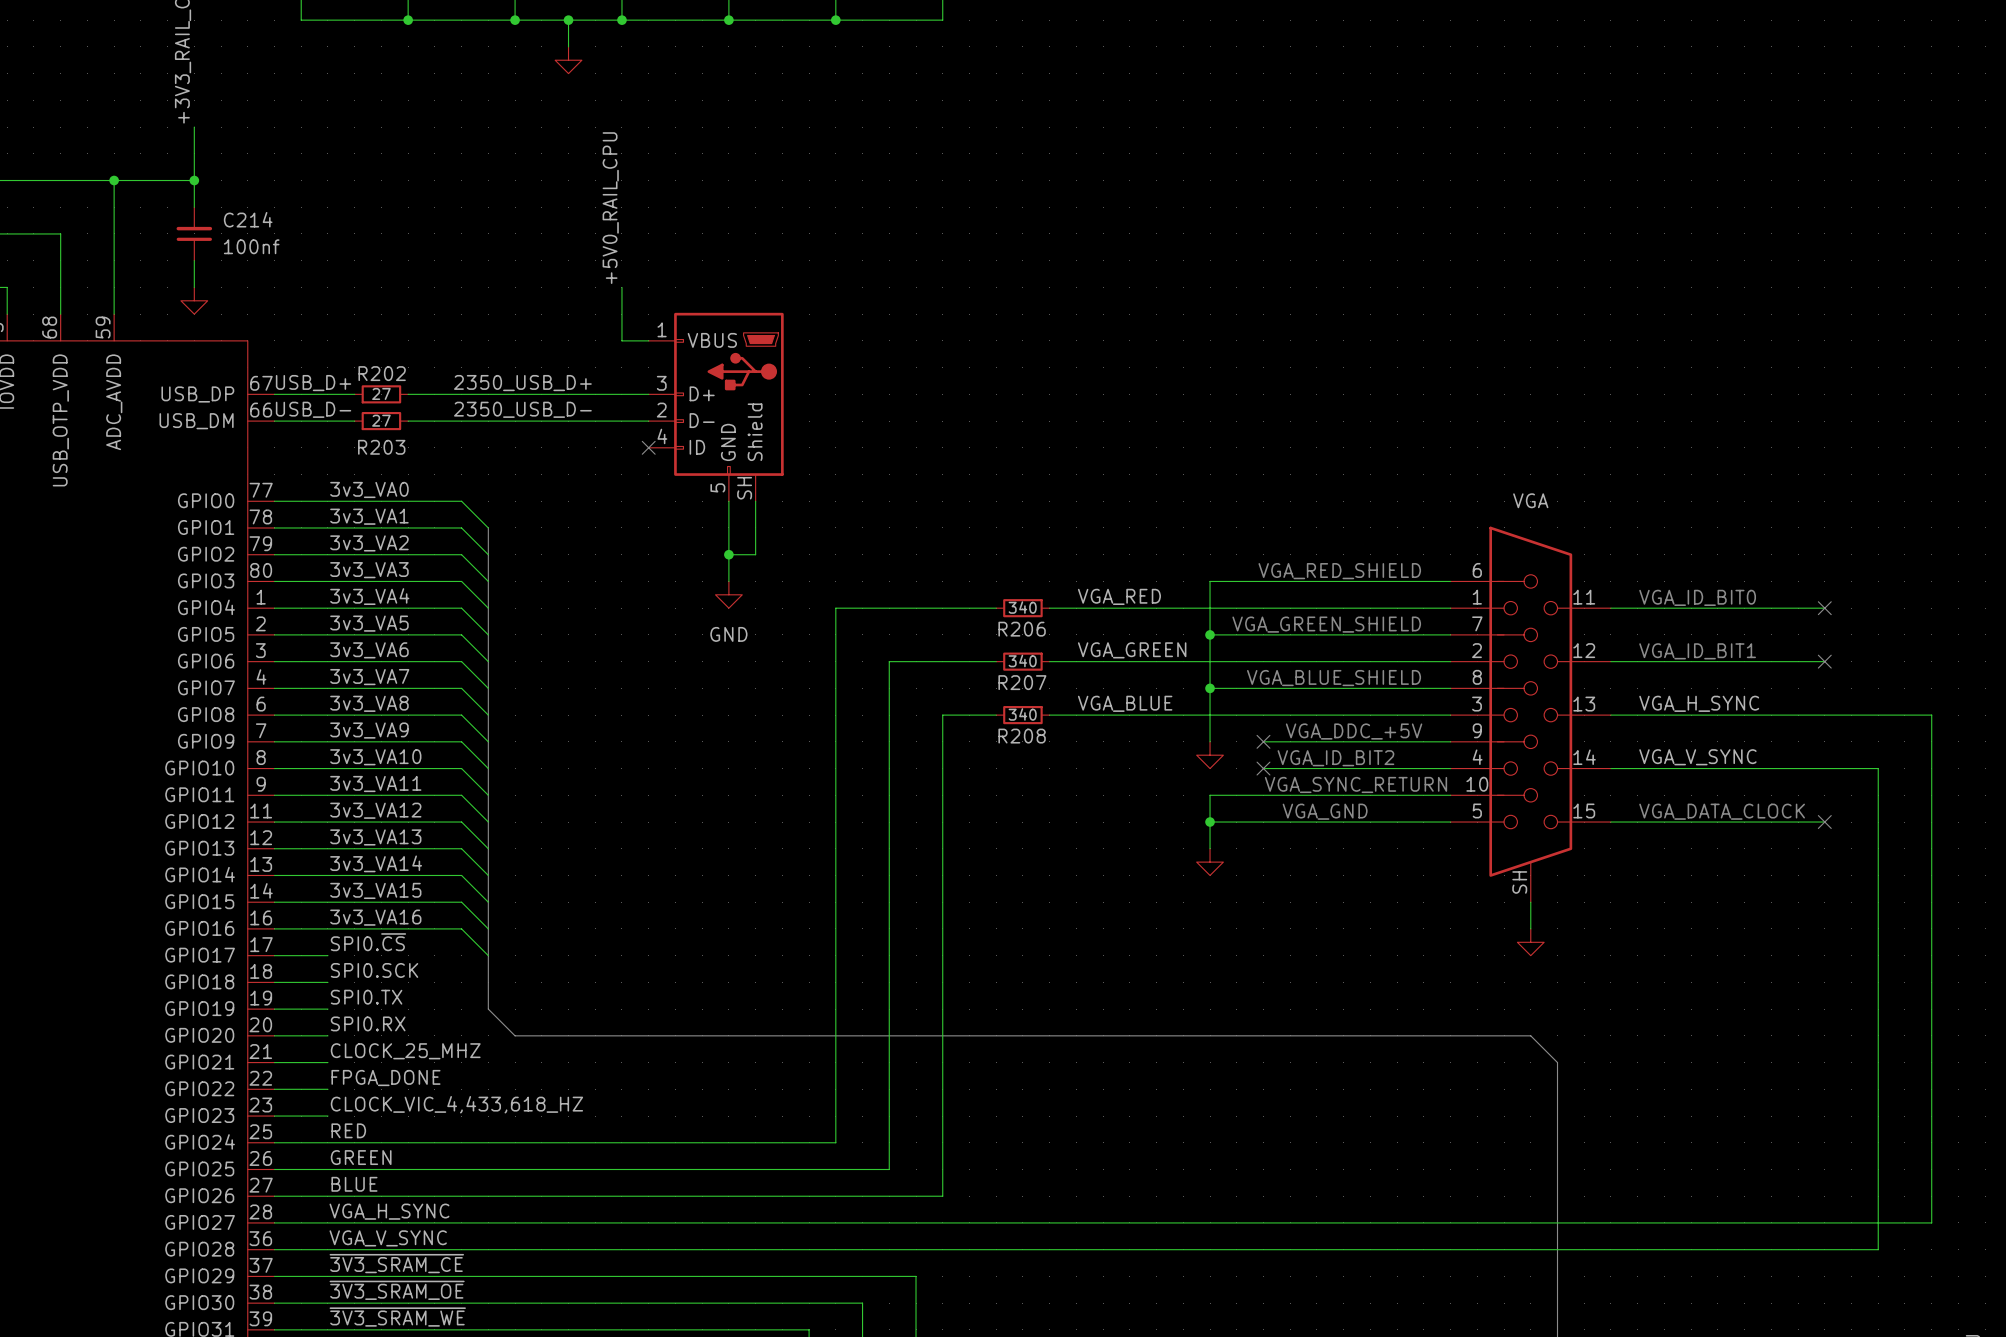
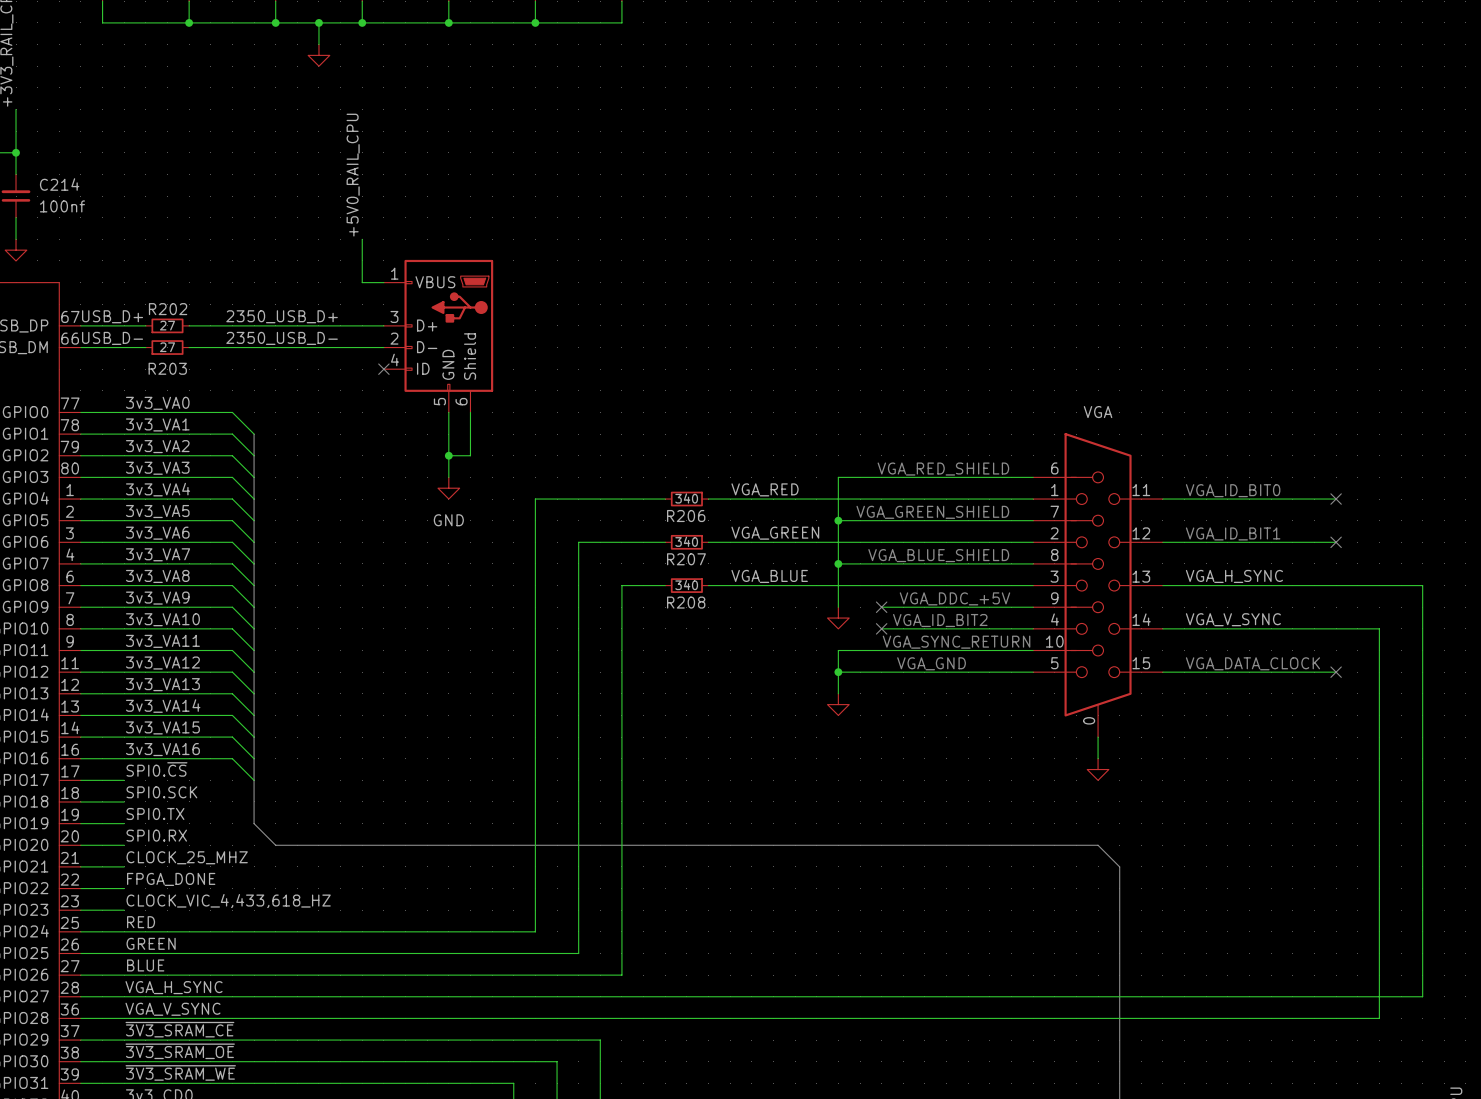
part pin number: SH (744, 488) -> 6 (461, 401)
part pin number: SH (1519, 882) -> 0 (1089, 720)

